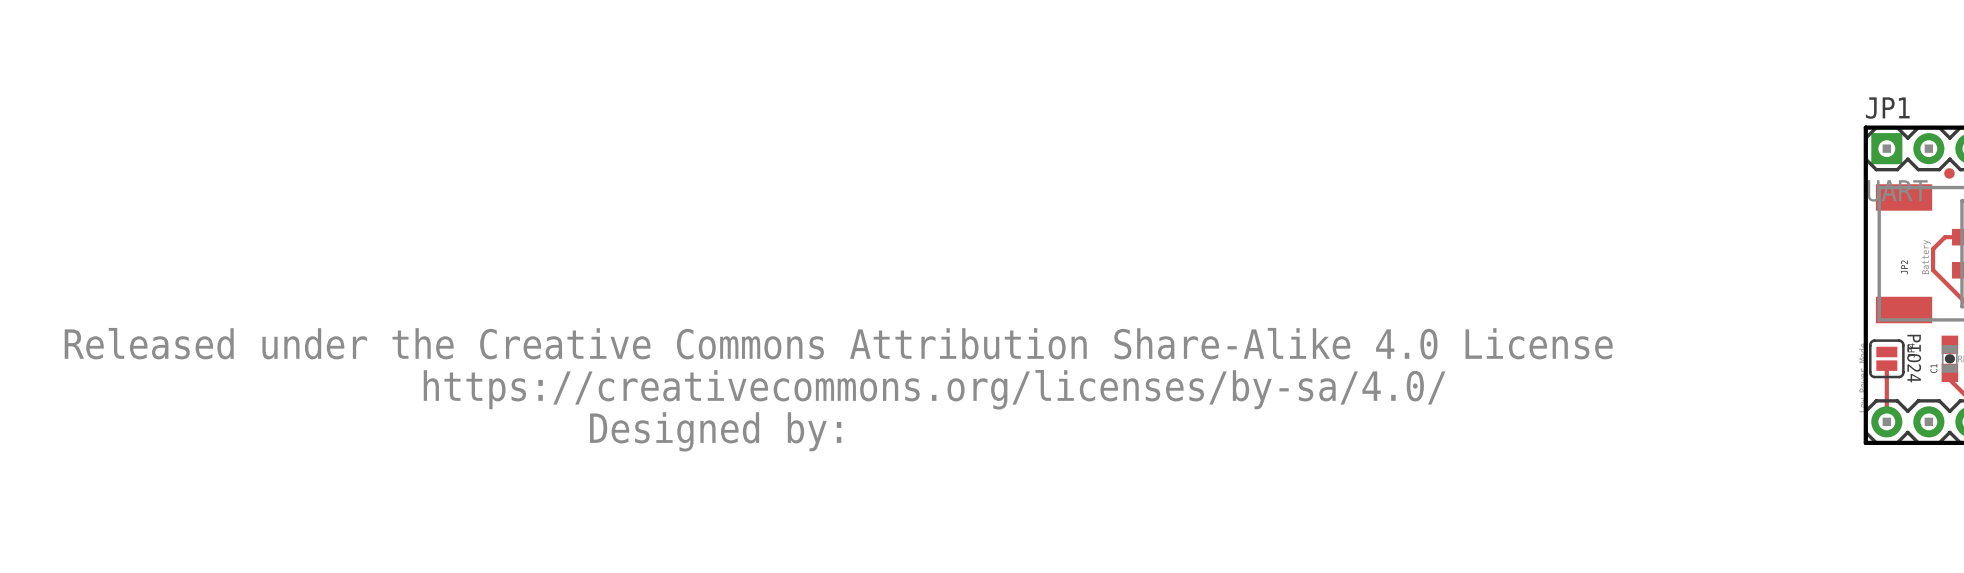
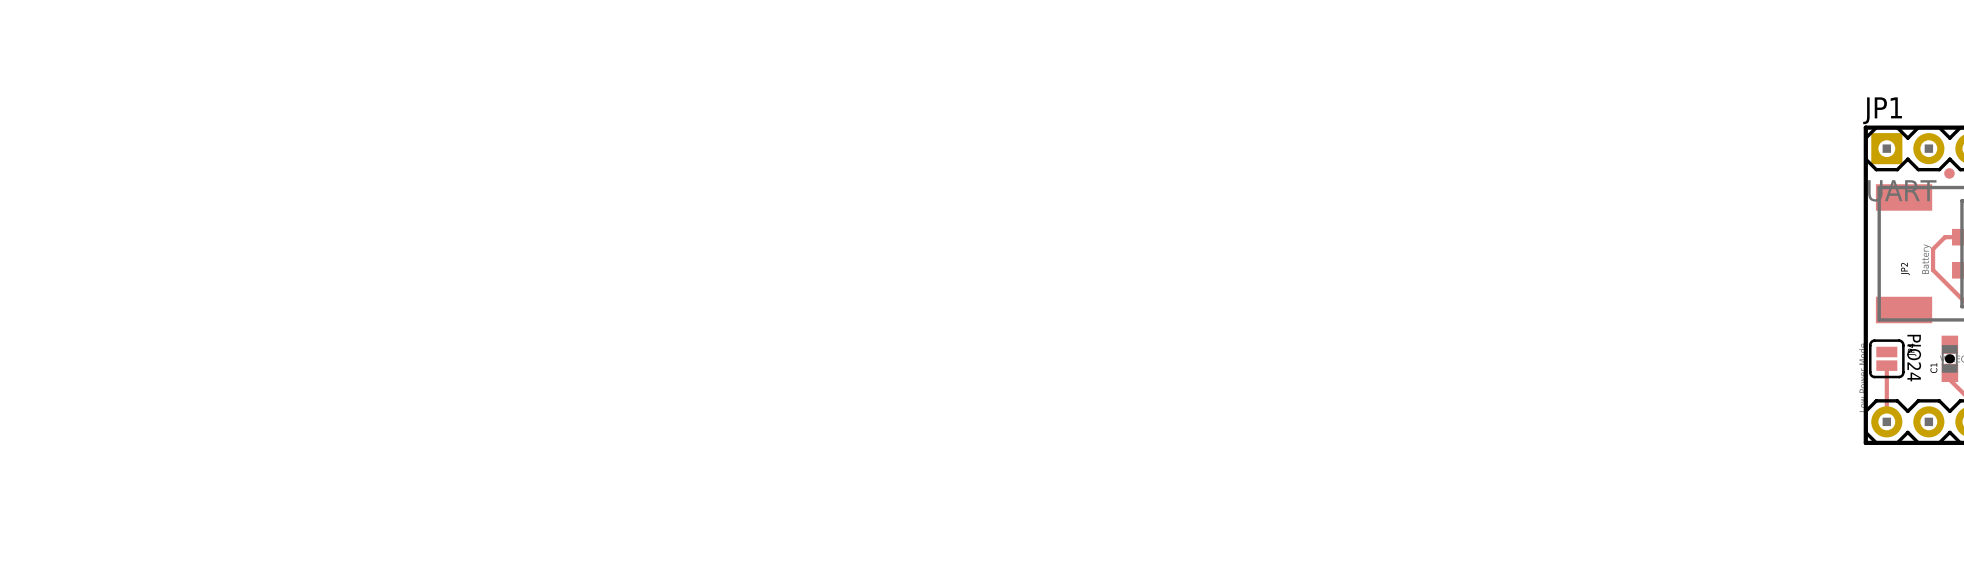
drawing: [64, 327, 1613, 452] -> none

